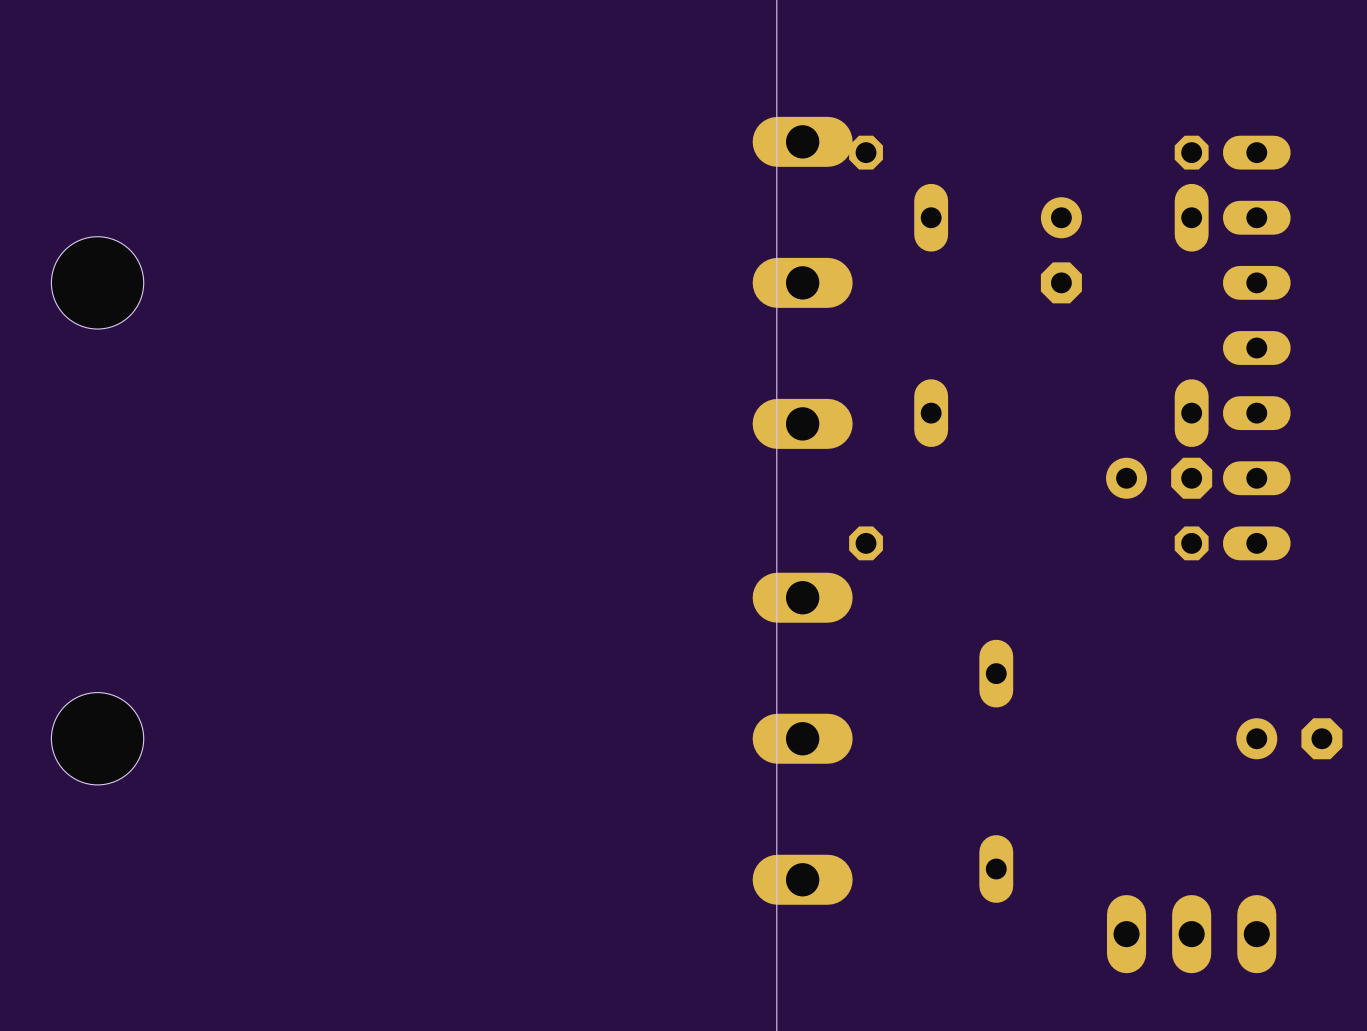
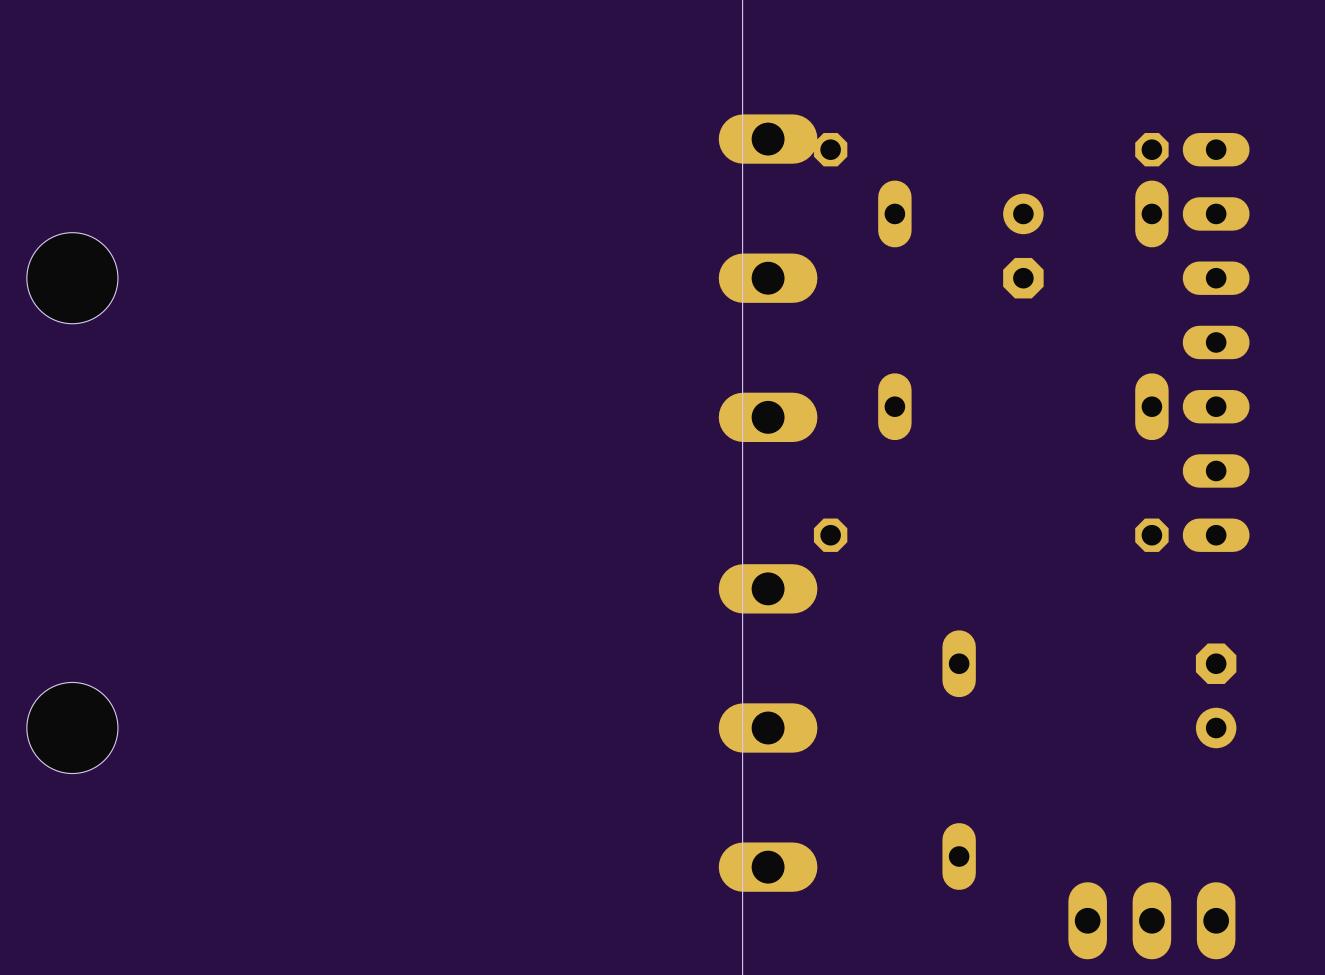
part: (1159, 478) -> none
part rotation: 0° (1289, 738) -> 90° counterclockwise (1216, 695)

